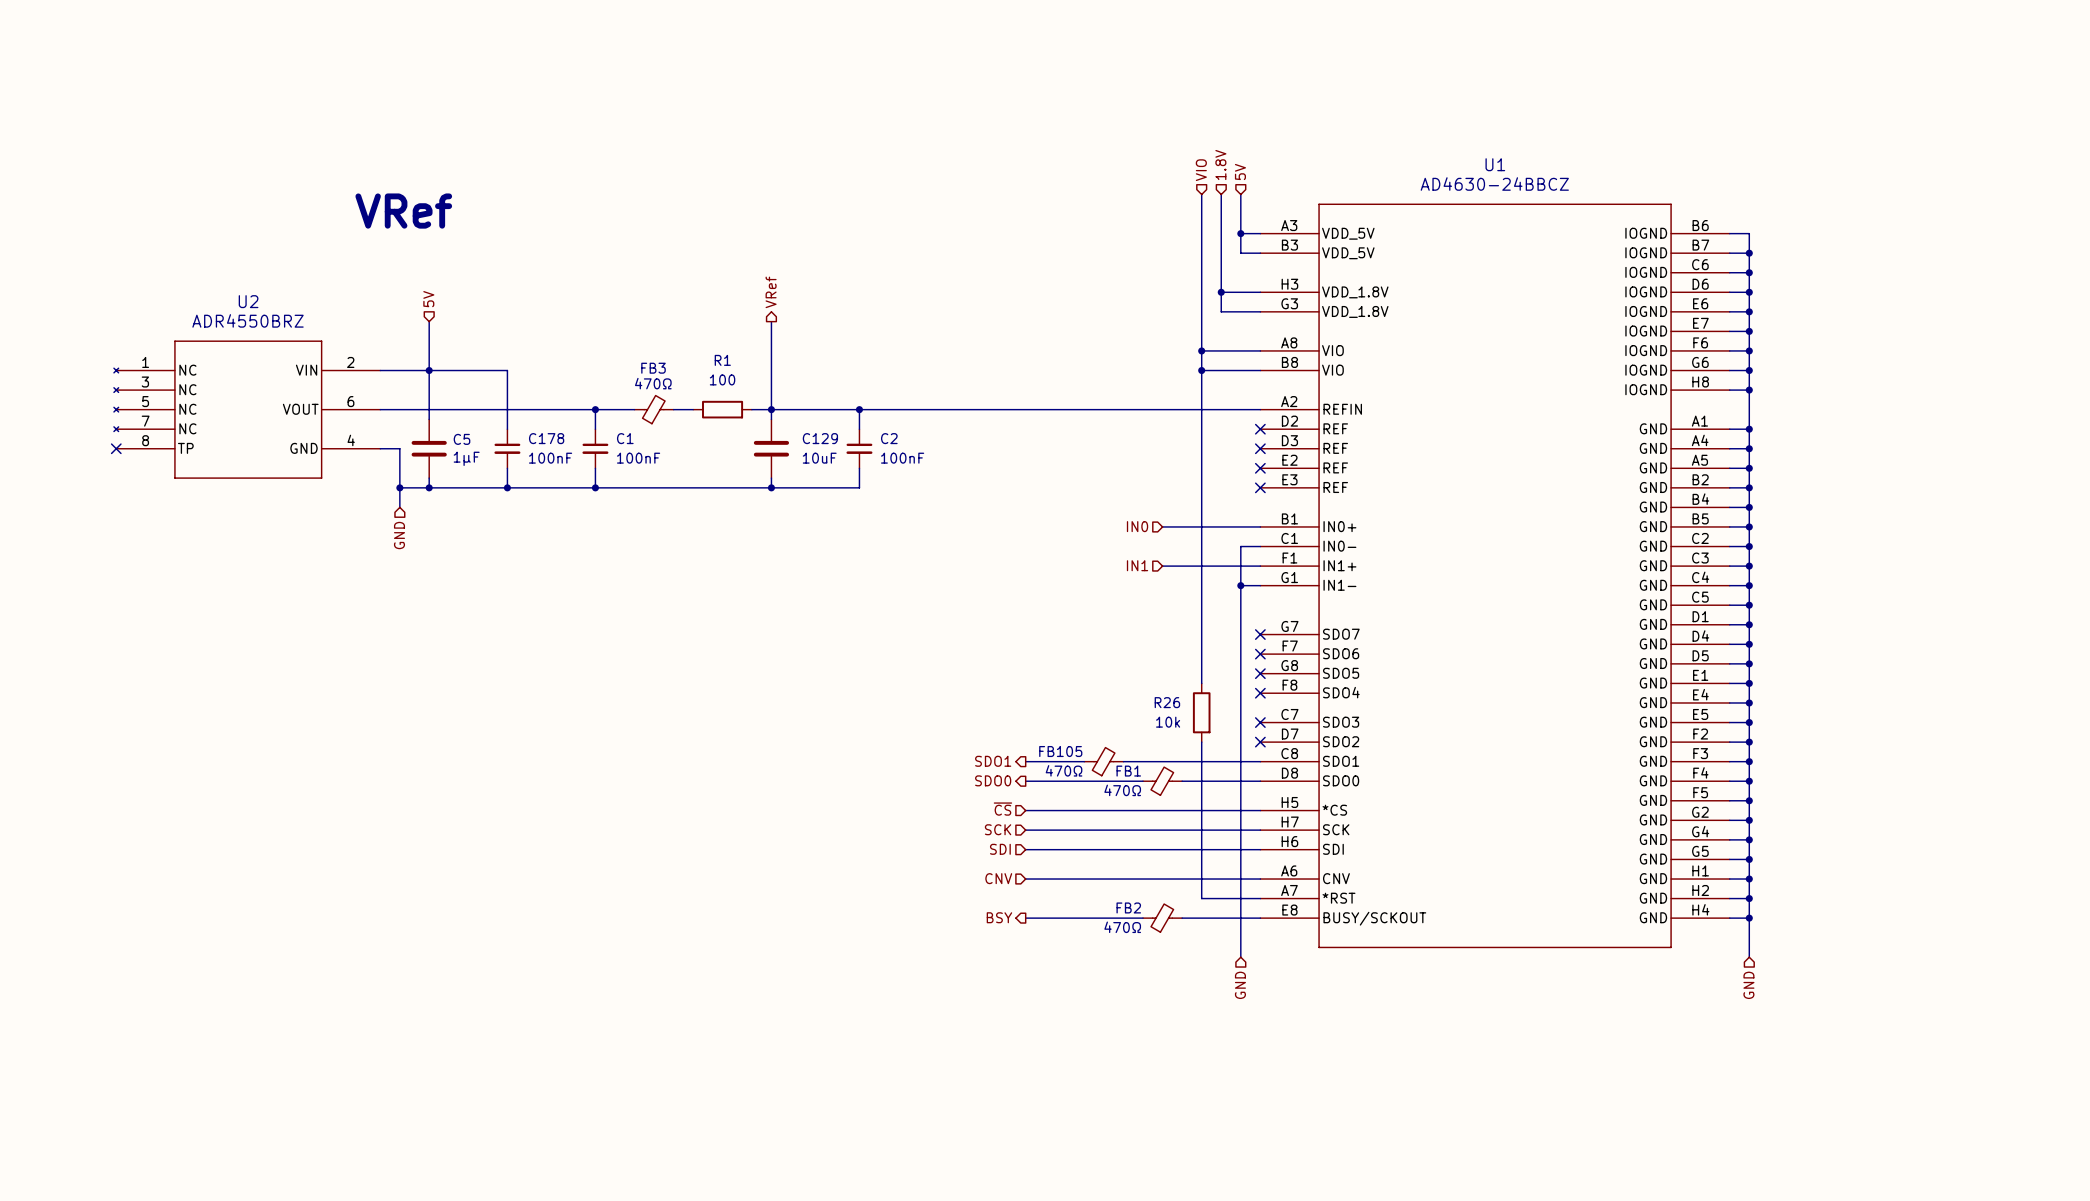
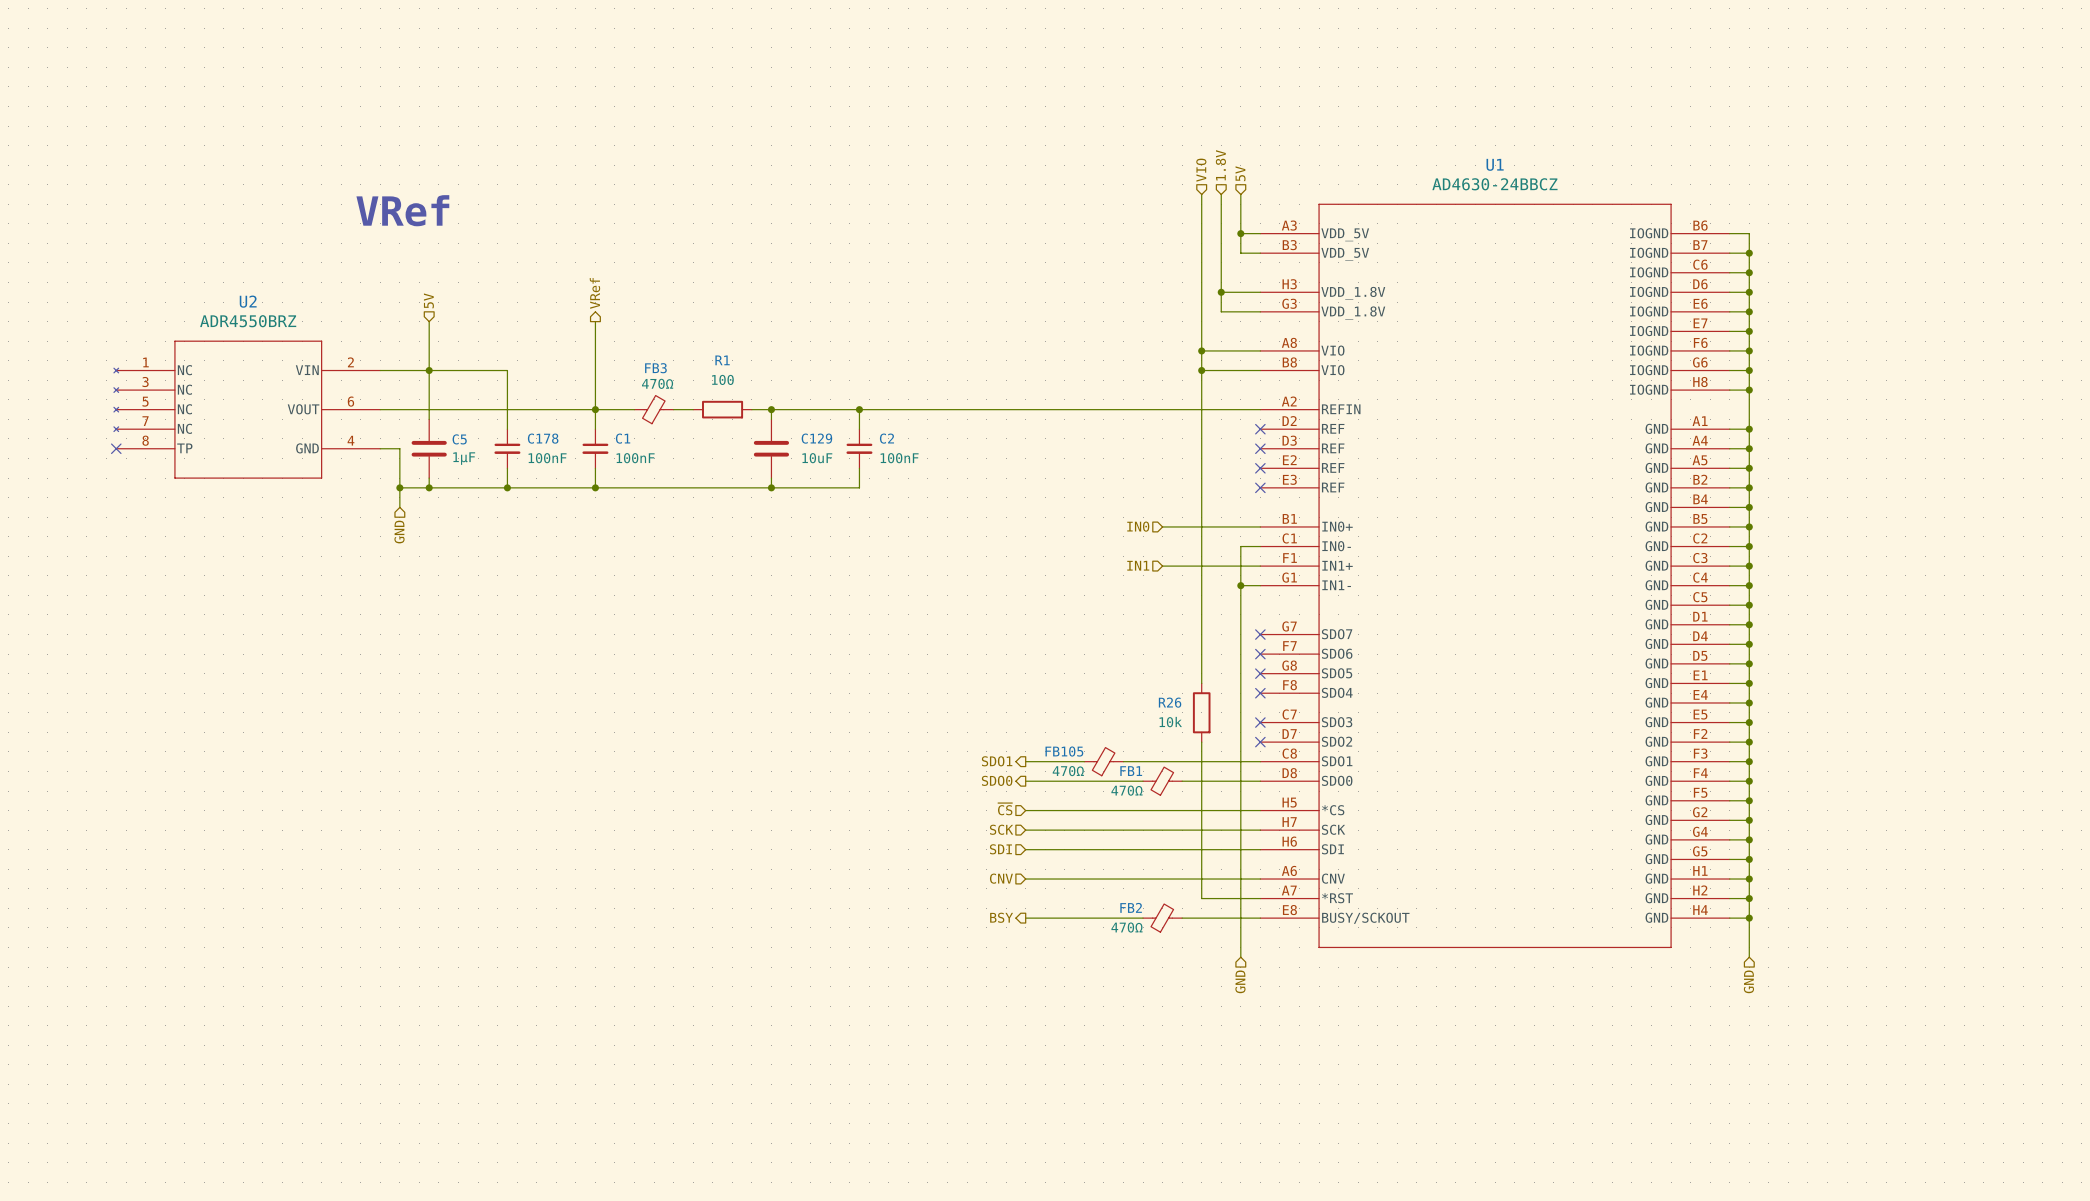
hierarchical label position: VRef (771, 292) -> VRef (594, 293)
wire: (771, 321) (771, 409) -> (595, 321) (595, 409)

